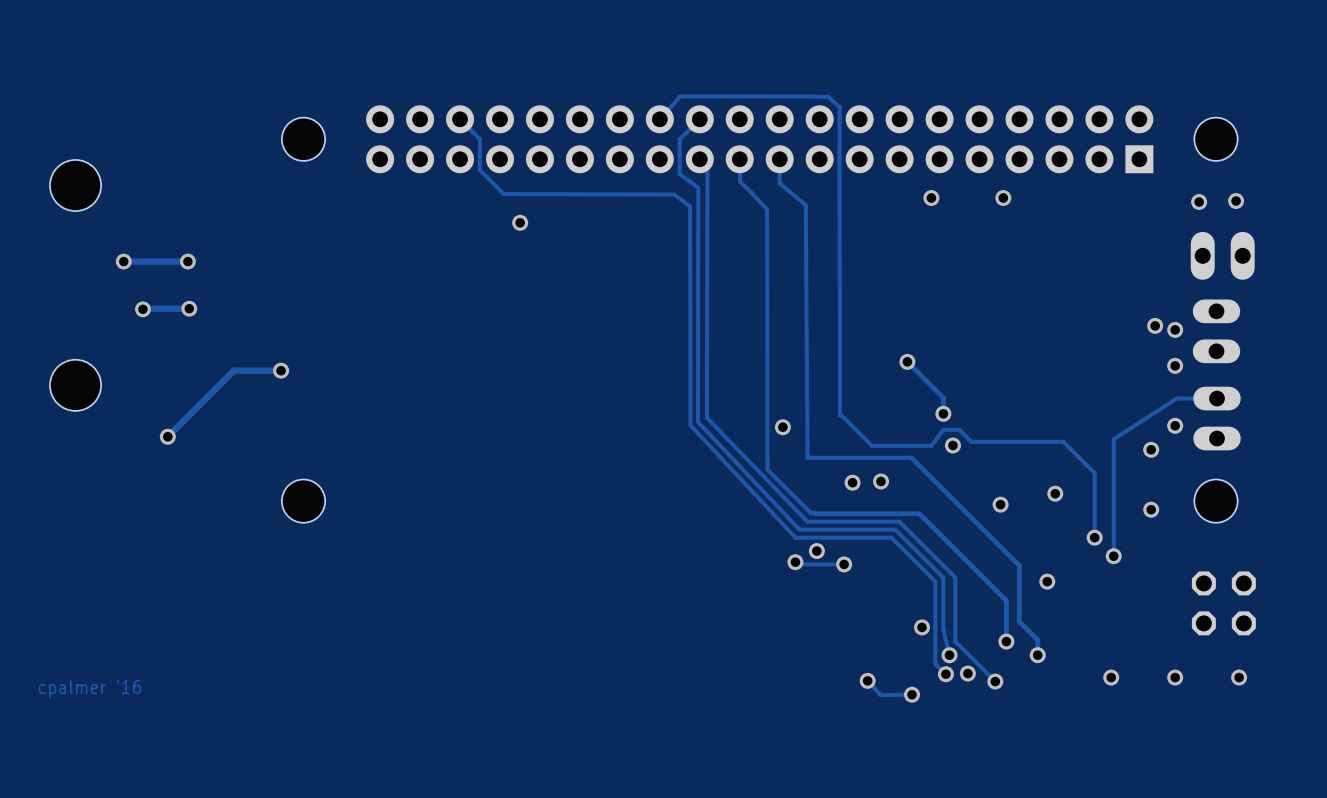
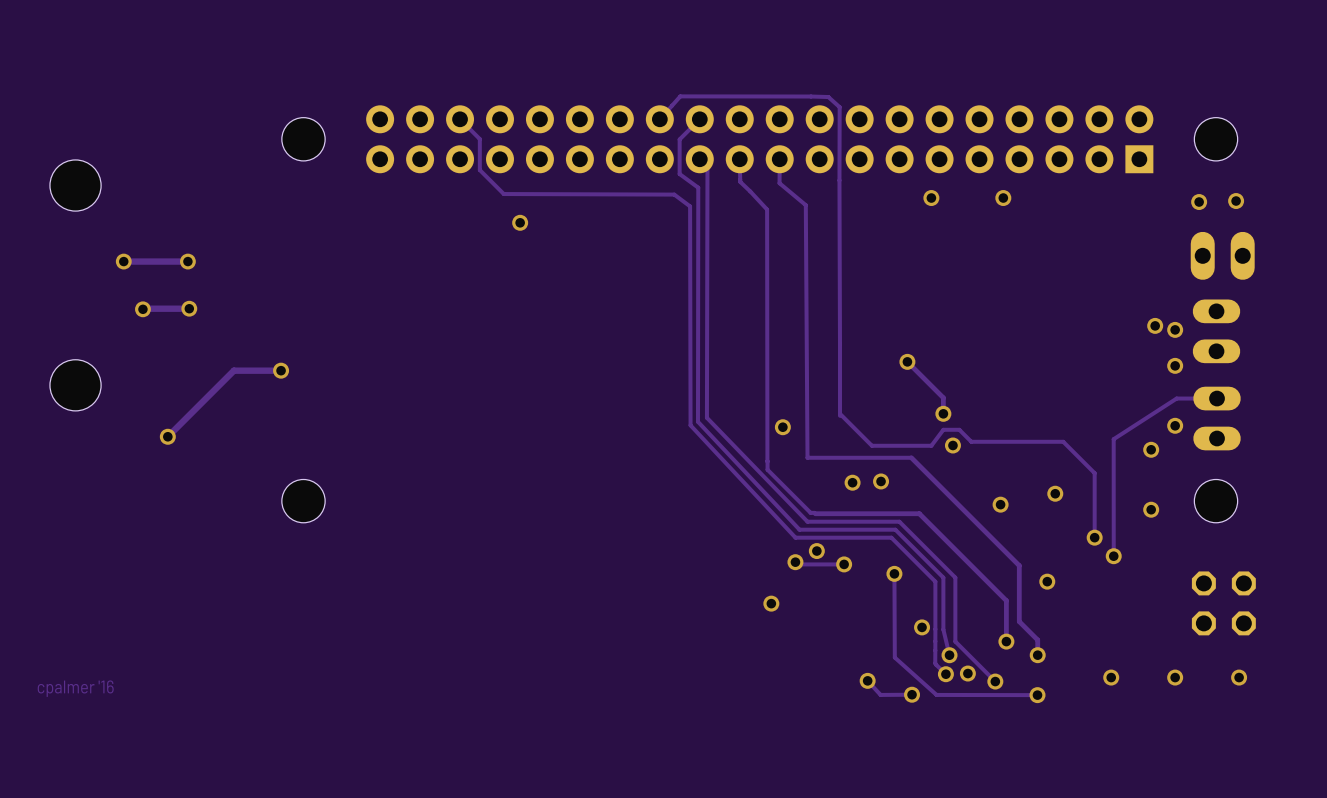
track: none -> (894, 573) (894, 657) (936, 694) (1037, 695)
via: none -> (894, 573)
via: none -> (771, 603)
via: none -> (1037, 695)

